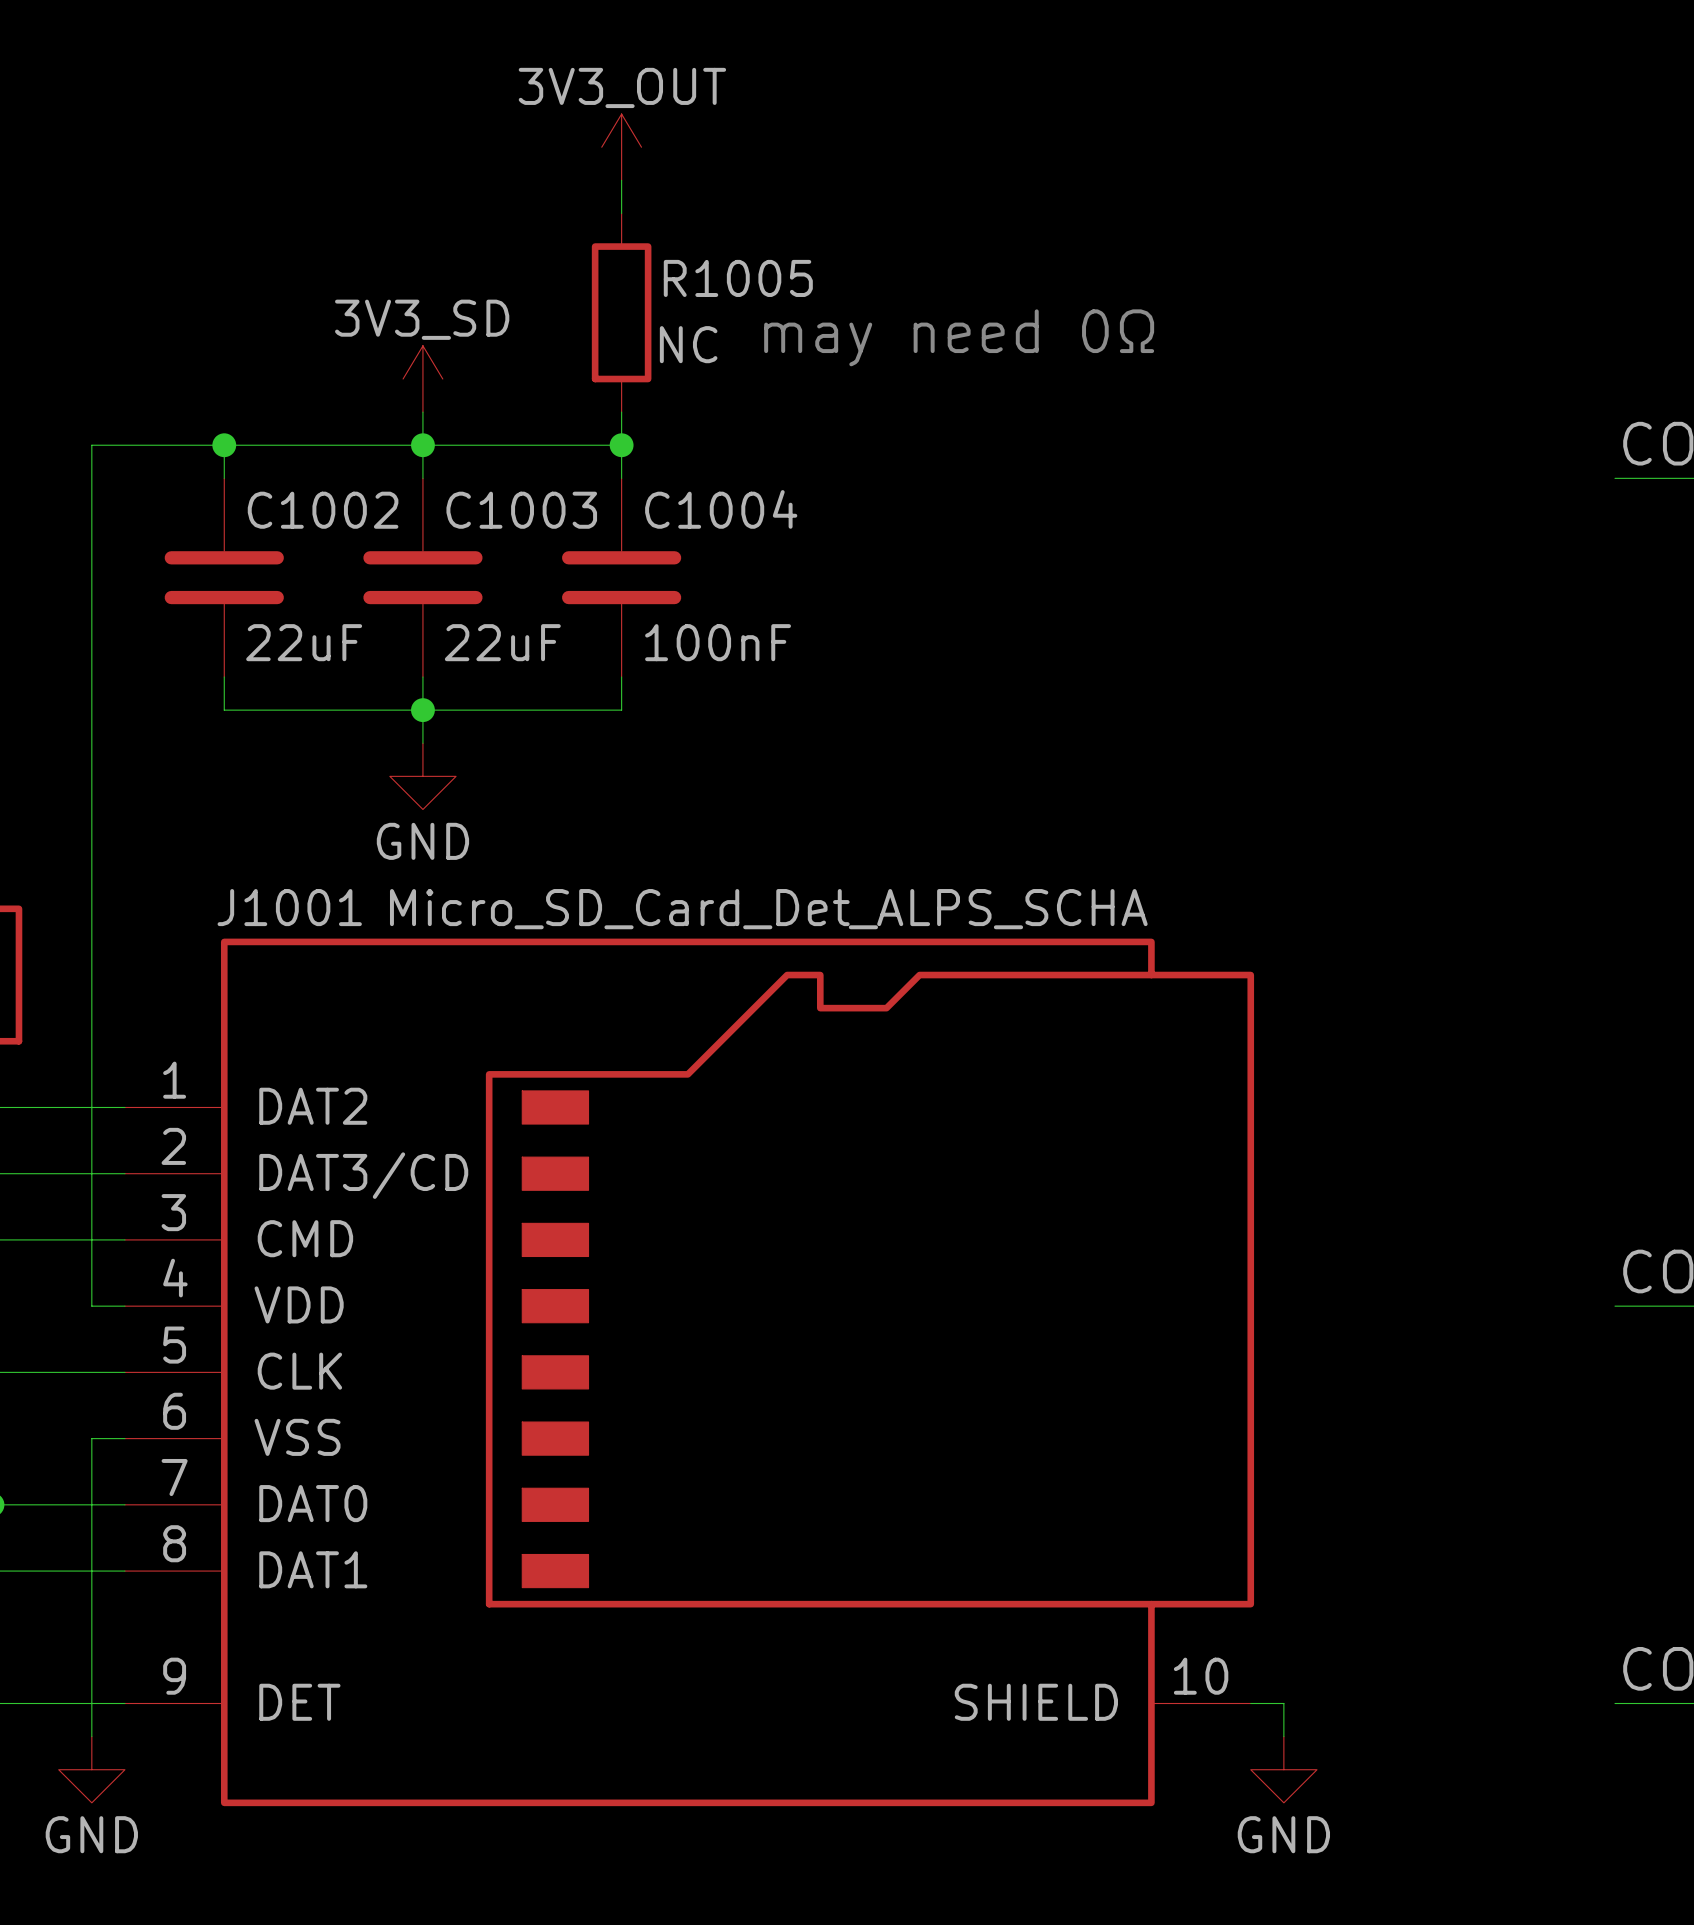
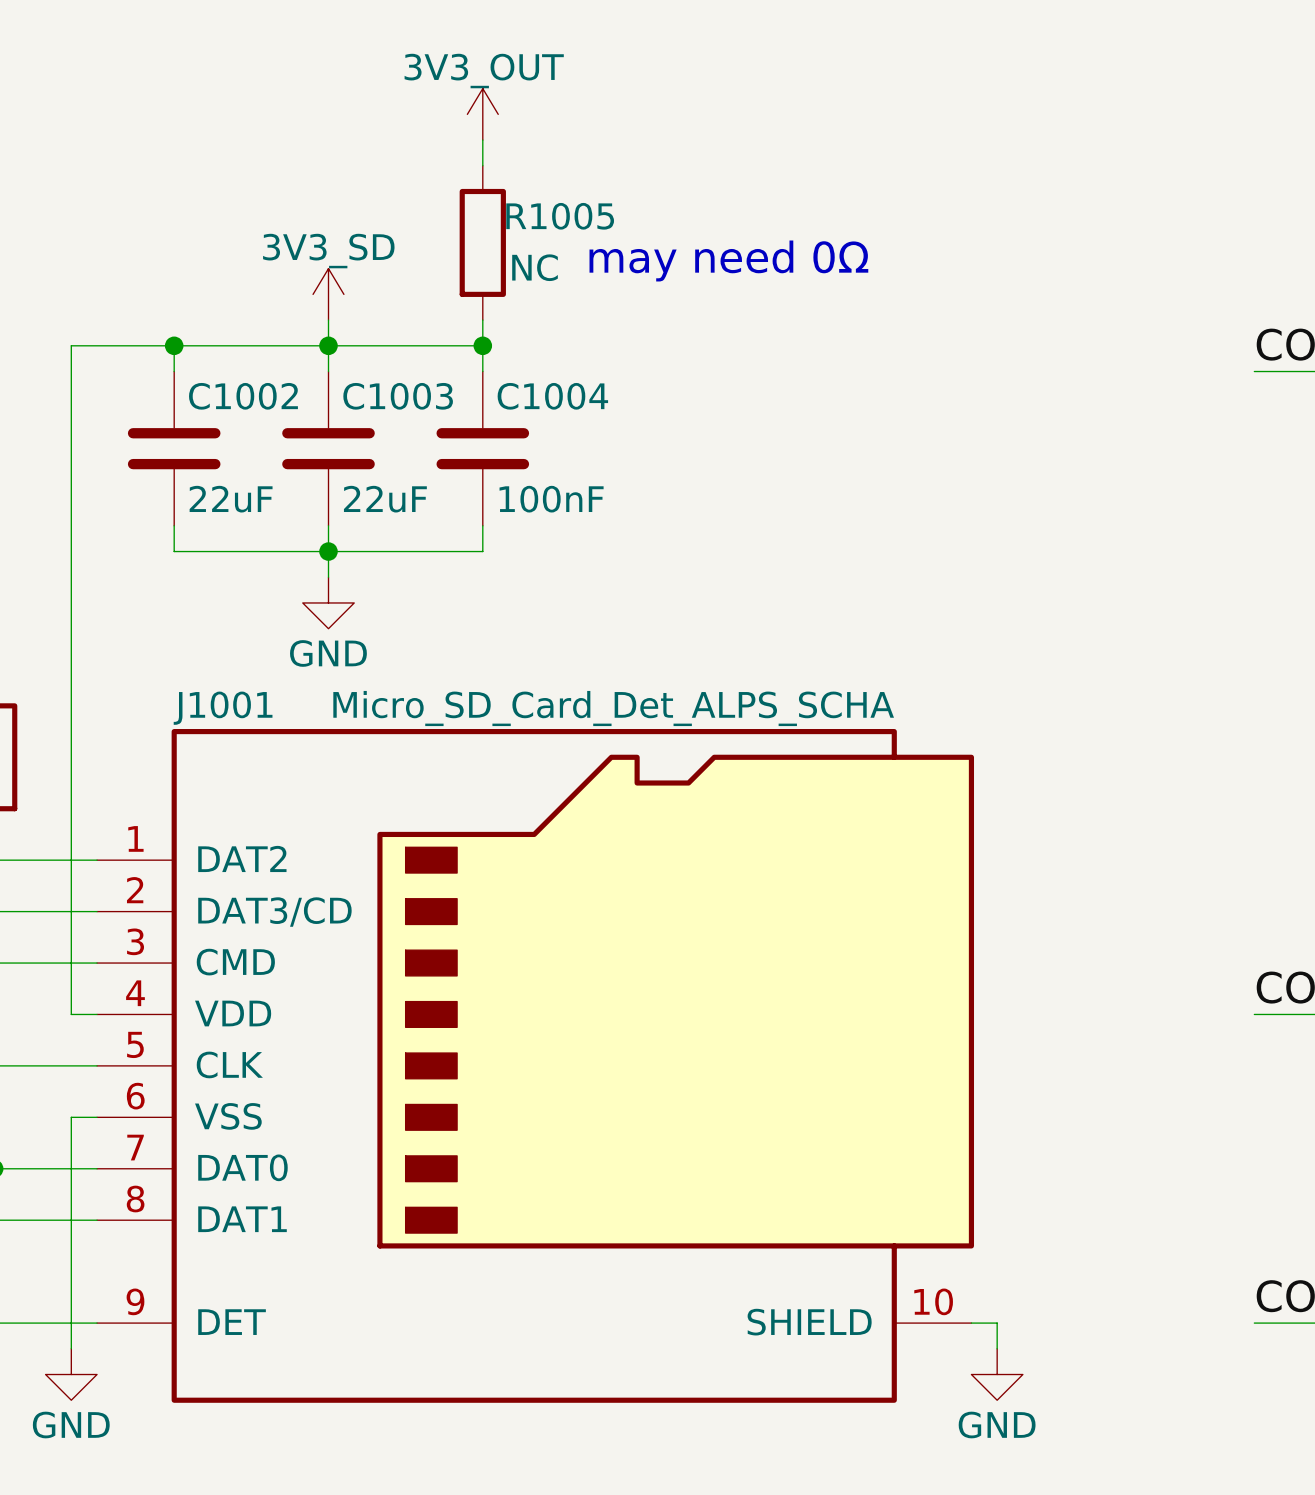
R1005 name position: R1005 (738, 278) -> R1005 (560, 216)

